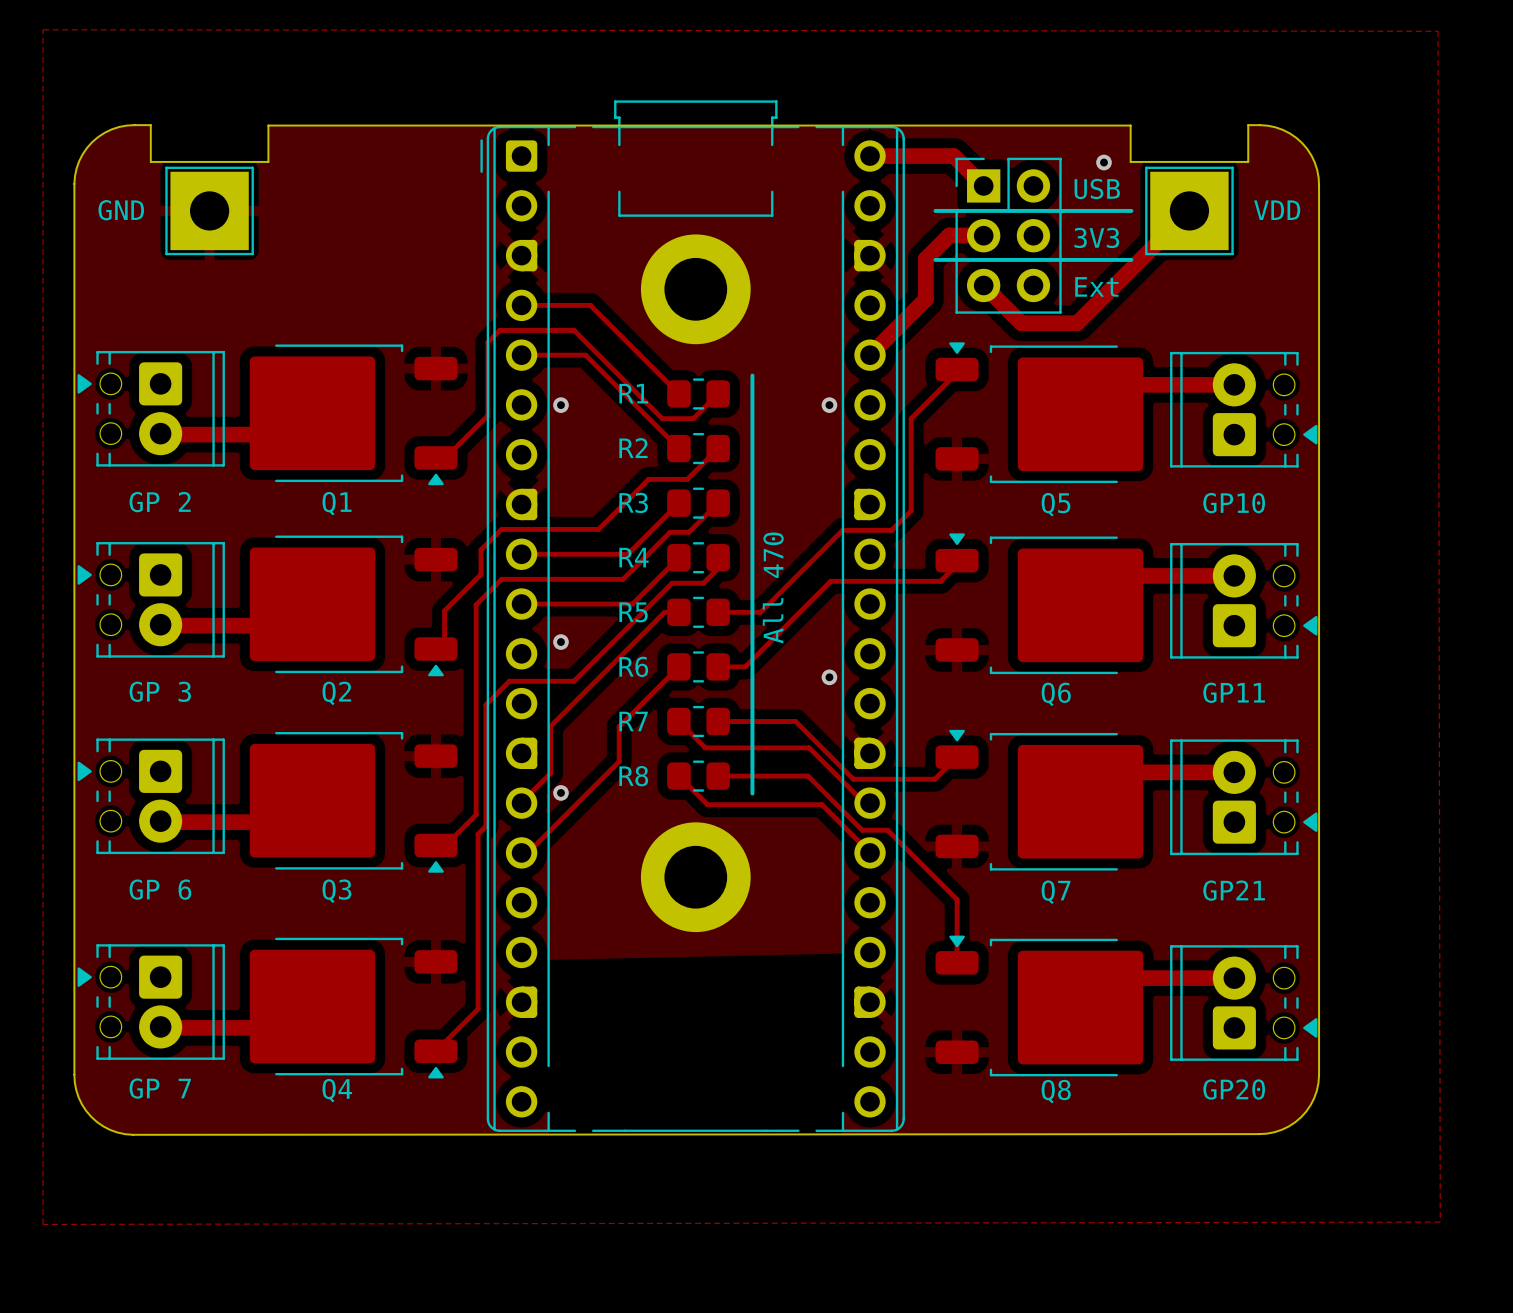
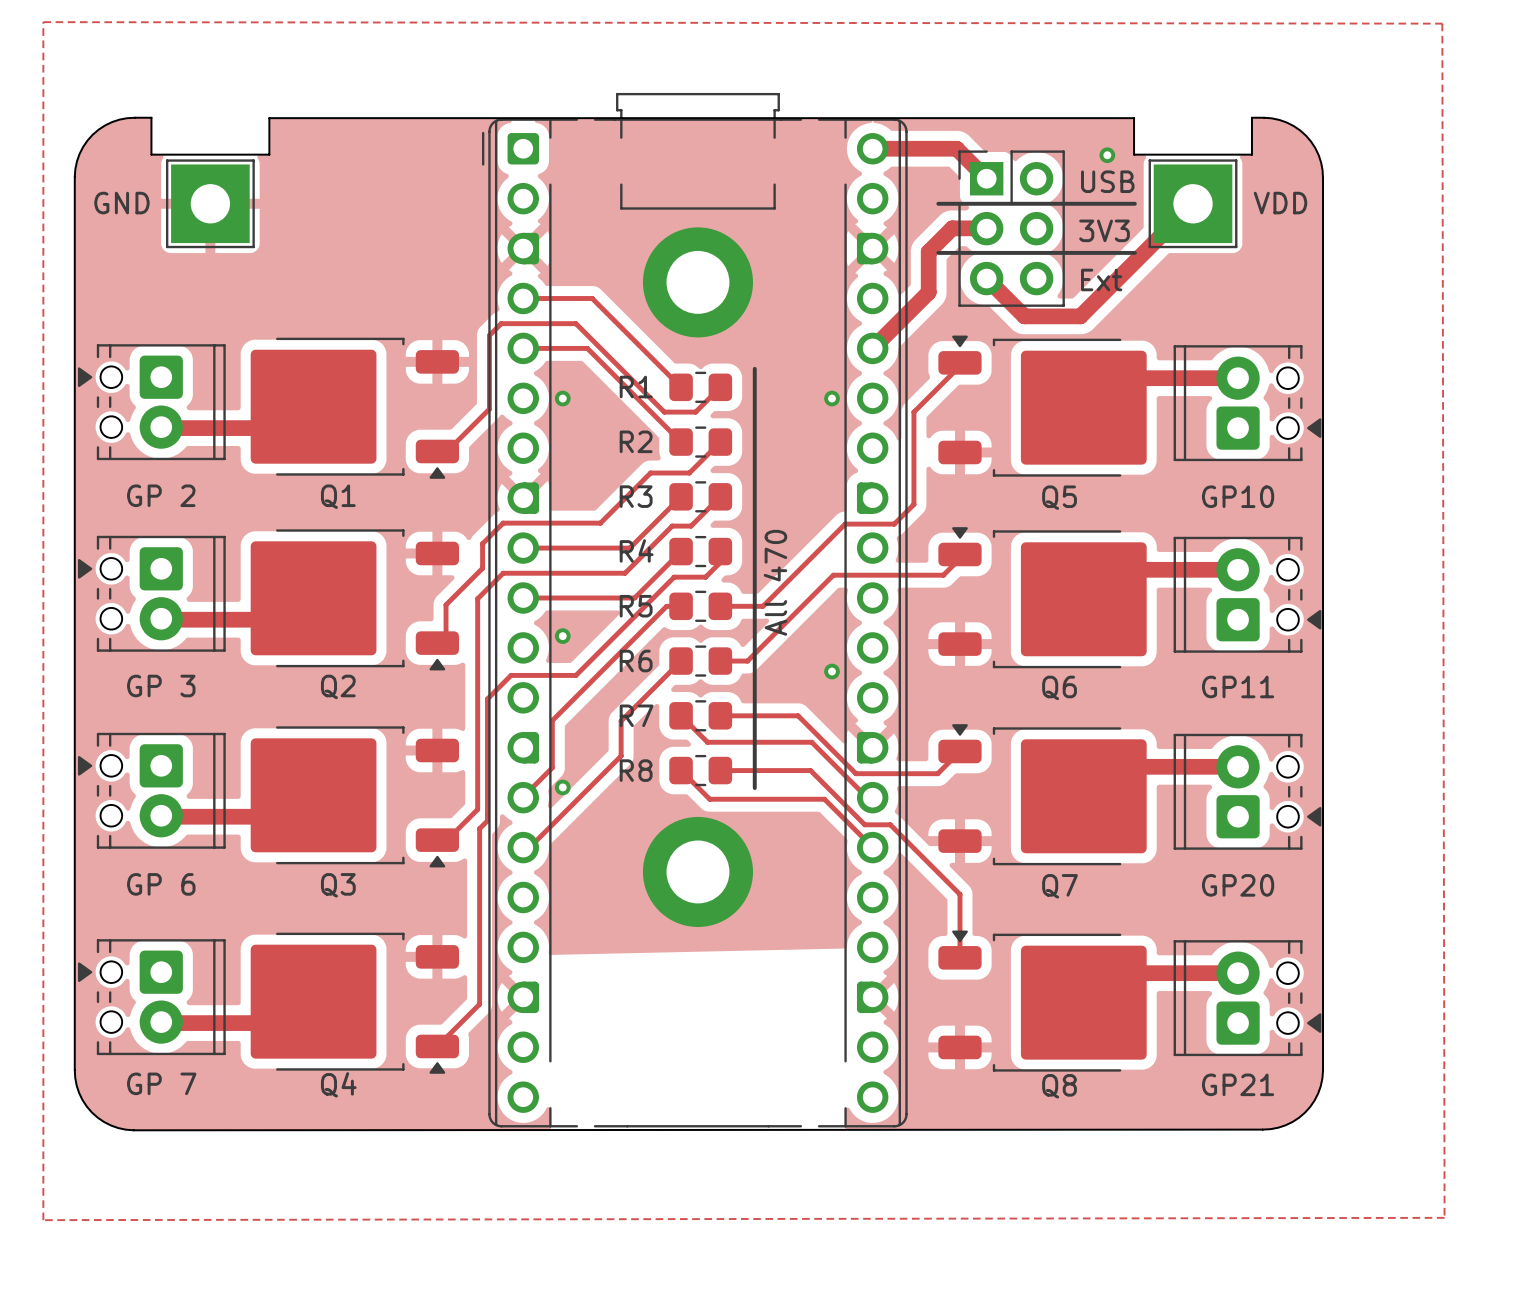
part value: GP21 (1234, 890) -> GP20 (1238, 885)
part value: GP20 (1234, 1089) -> GP21 (1238, 1084)

